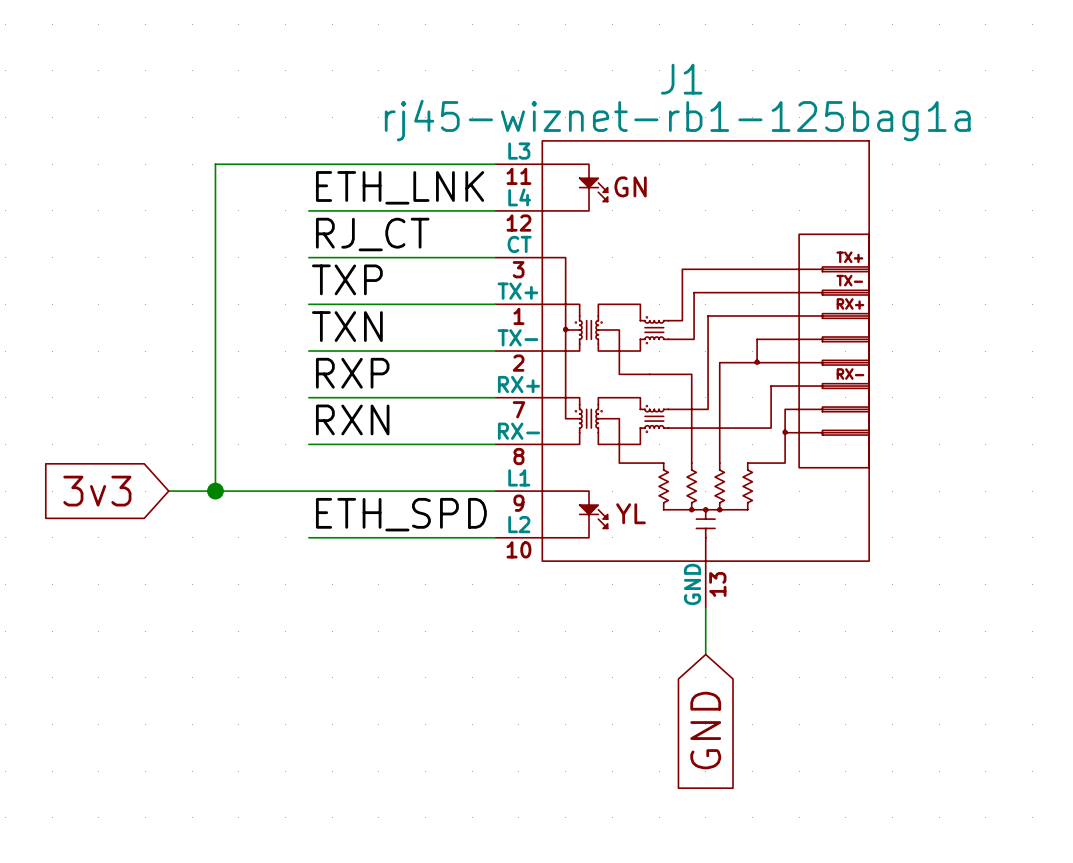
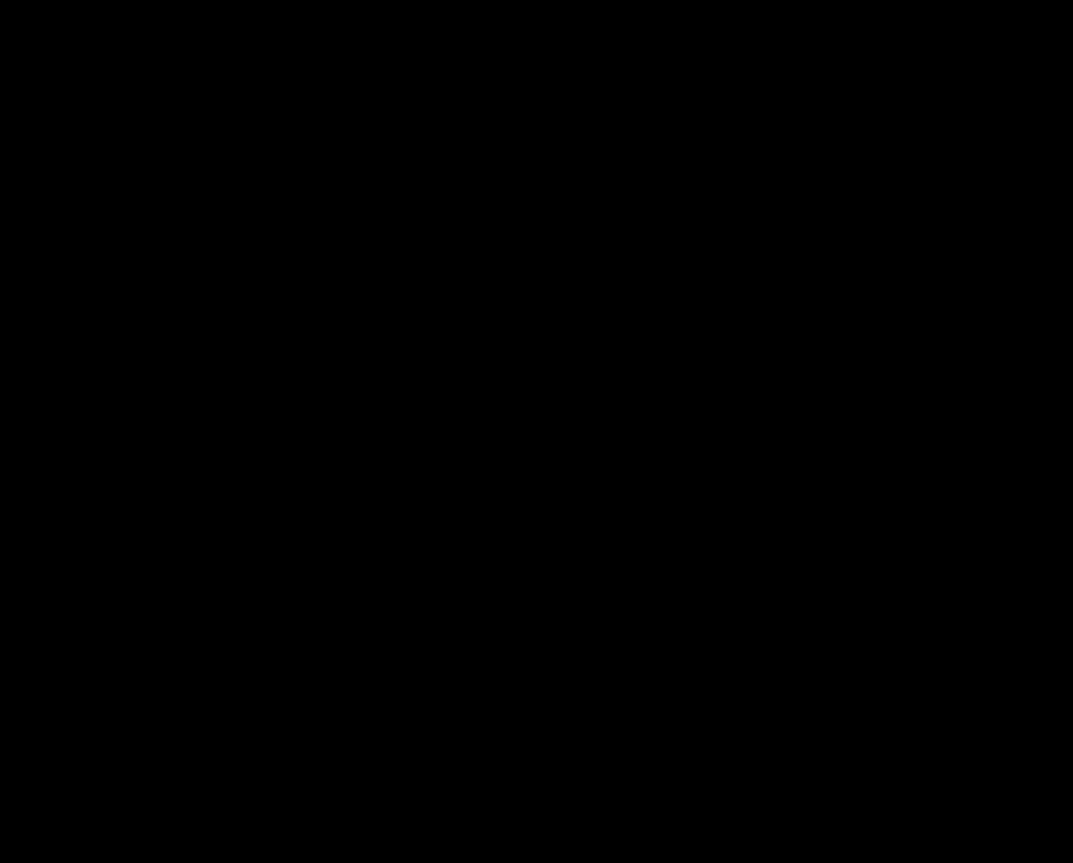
wire: (495, 164) (215, 164) (215, 491) -> none
label: ETH_LNK (400, 187) -> none
wire: (308, 210) (495, 210) -> none
label: RJ_CT (372, 234) -> none
wire: (308, 257) (495, 257) -> none
label: TXP (347, 279) -> none
wire: (308, 304) (495, 304) -> none
label: TXN (347, 326) -> none
wire: (308, 351) (495, 351) -> none
label: RXP (352, 373) -> none
J1: rj45-wiznet-rb1-125bag1a (682, 374) -> none
wire: (308, 397) (495, 397) -> none
label: RXN (352, 419) -> none
wire: (308, 444) (495, 444) -> none
global label: 3v3 (97, 491) -> none
wire: (168, 491) (495, 491) -> none
junction: (215, 491) -> none
label: ETH_SPD (401, 514) -> none
wire: (308, 537) (495, 537) -> none
wire: (705, 607) (705, 654) -> none
global label: GND (705, 730) -> none

